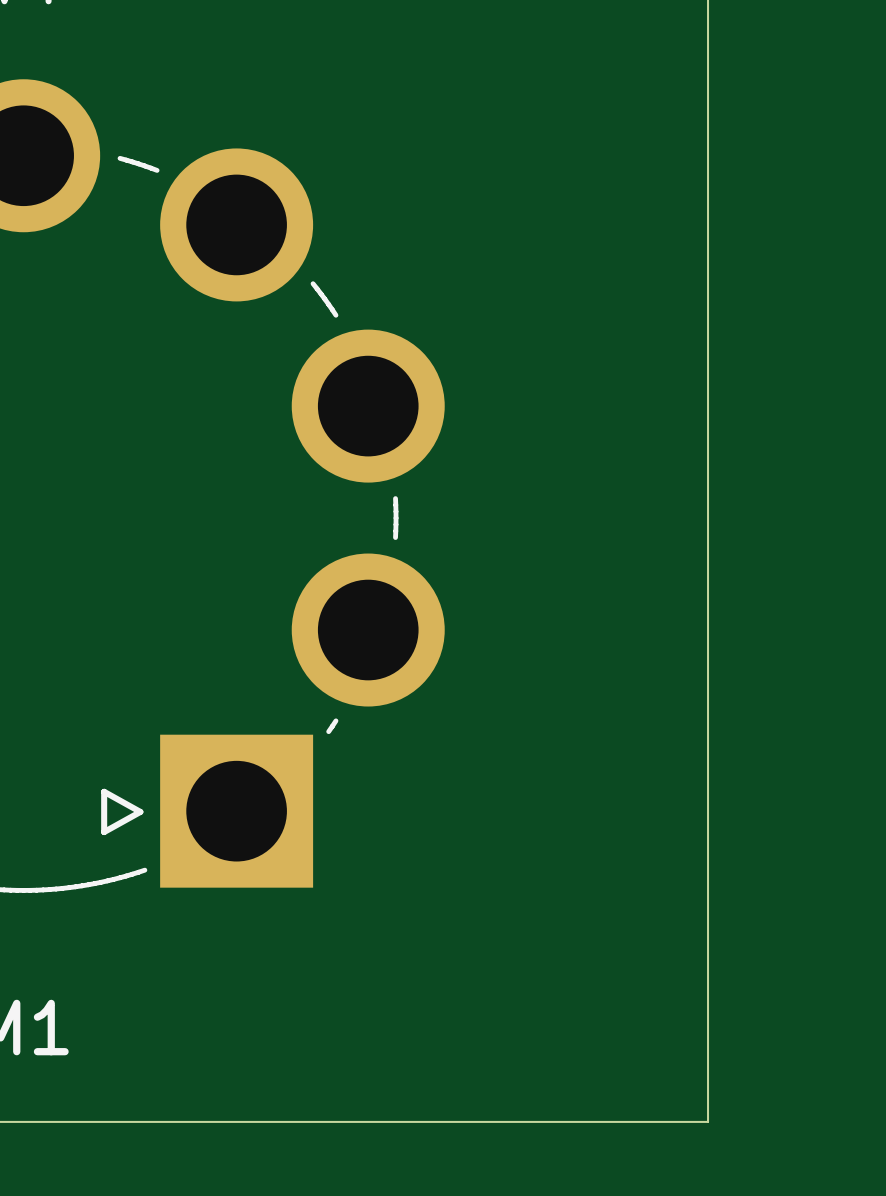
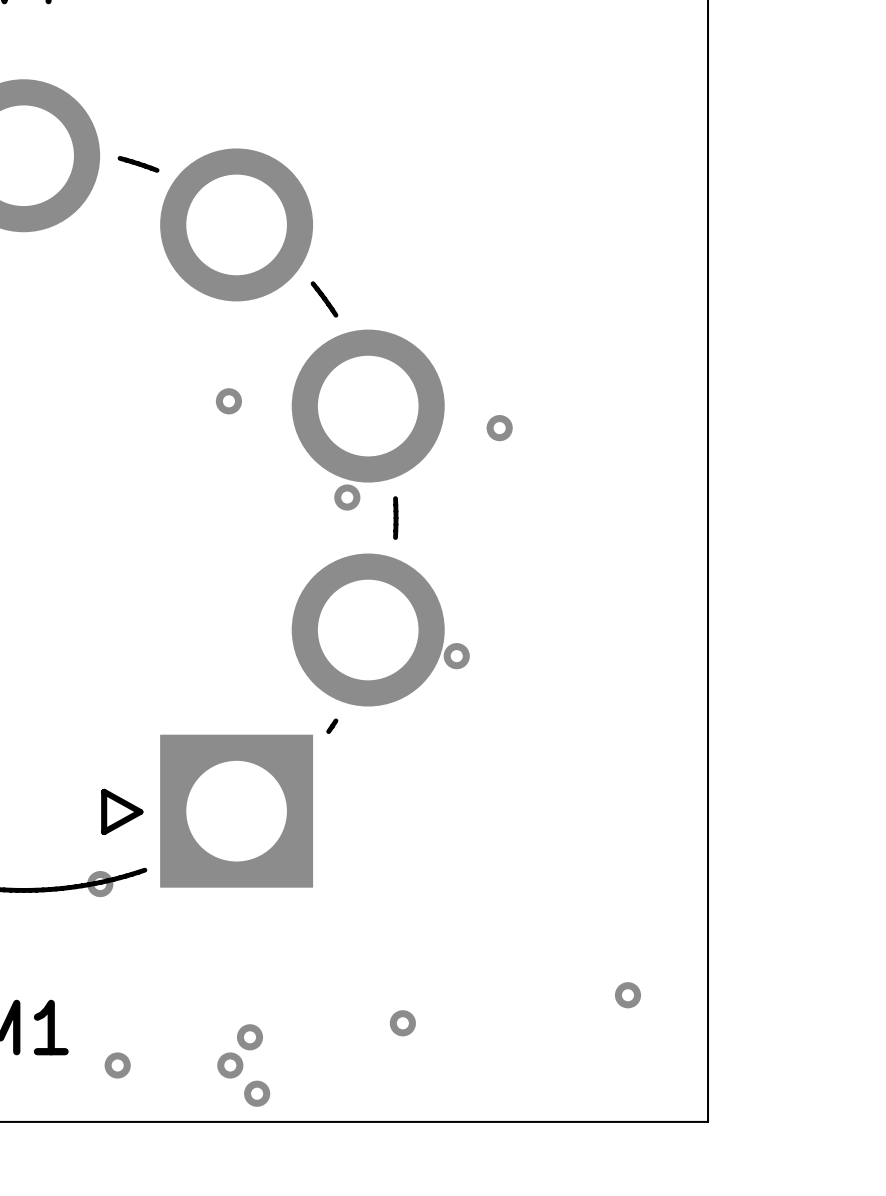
via: none -> (228, 401)
via: none -> (499, 428)
via: none -> (347, 497)
via: none -> (456, 656)
via: none -> (100, 884)
via: none -> (628, 995)
via: none -> (402, 1023)
via: none -> (250, 1037)
via: none -> (117, 1065)
via: none -> (230, 1065)
via: none -> (257, 1093)

